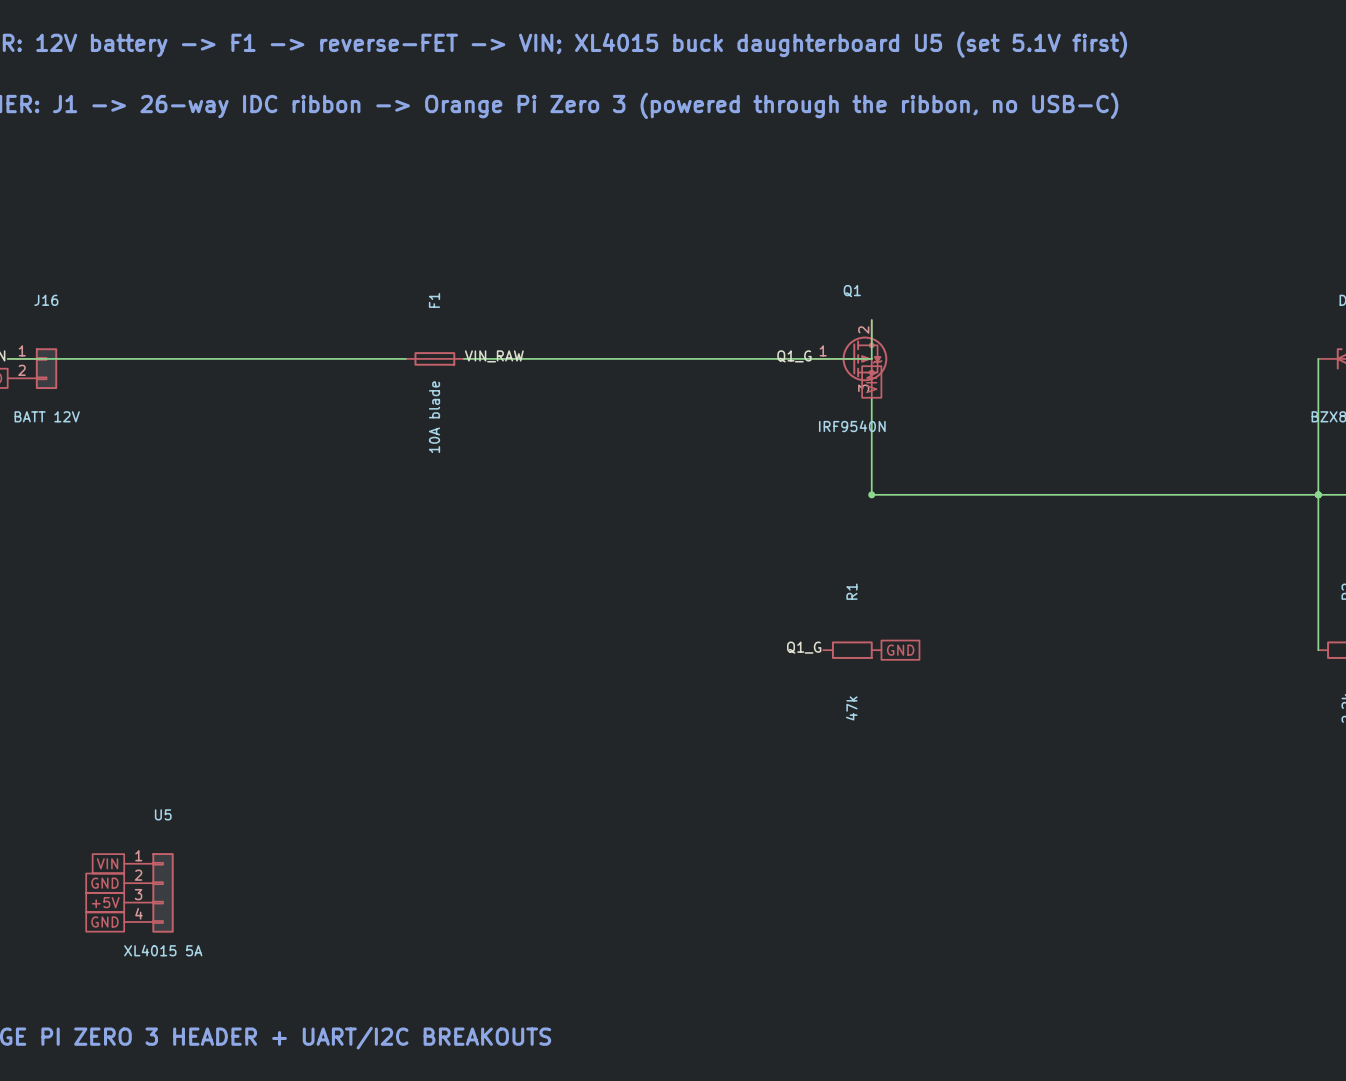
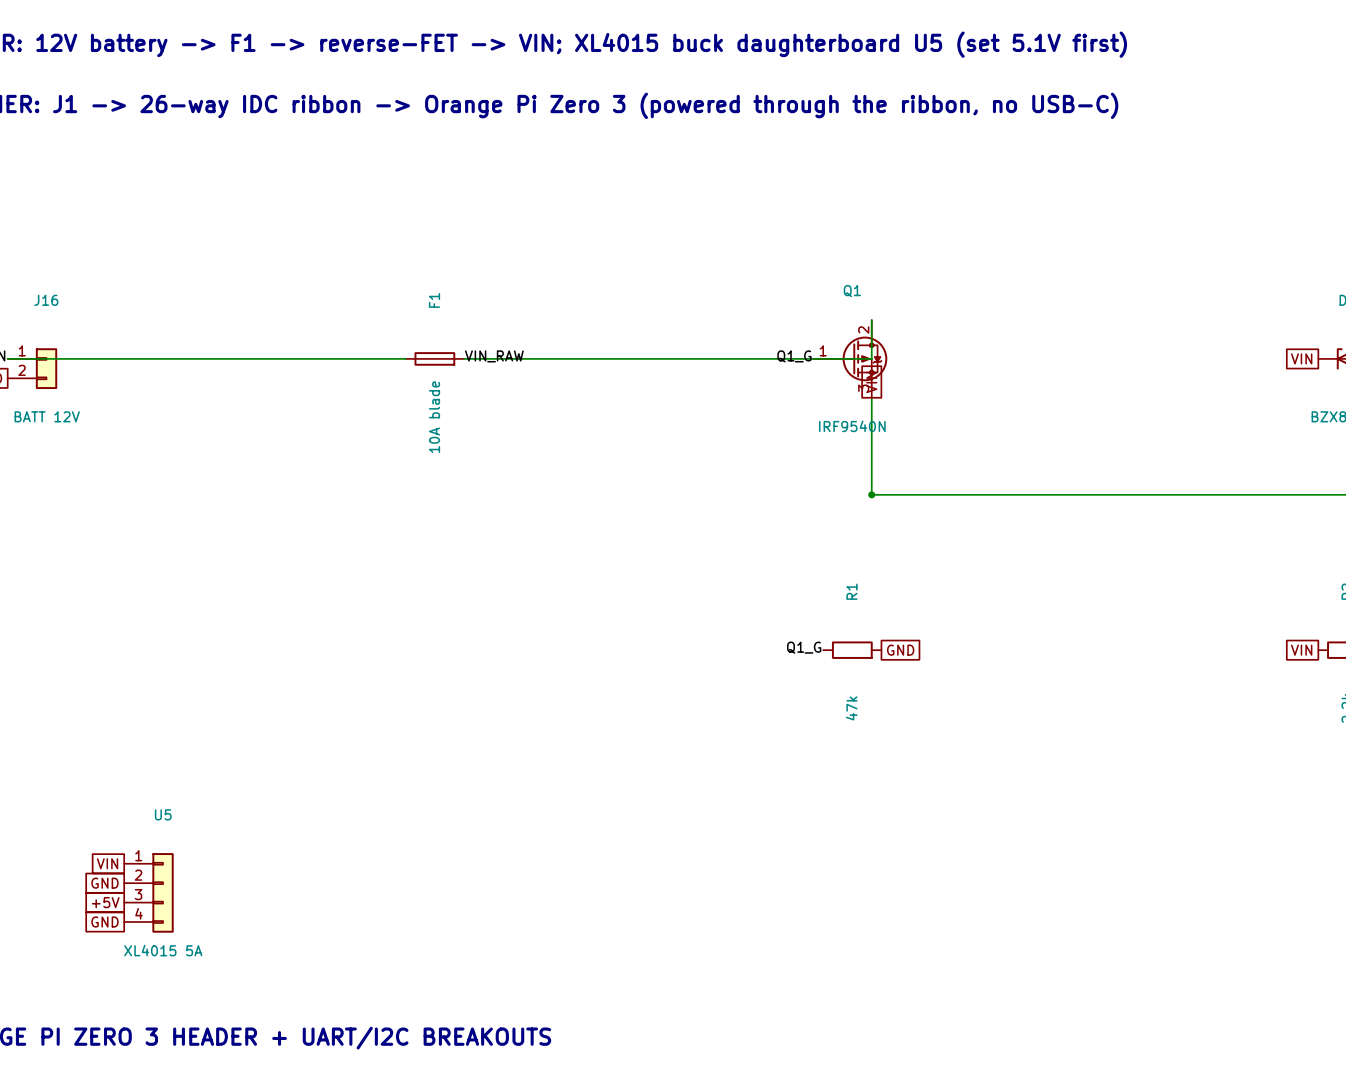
global label: none -> VIN (1301, 358)
wire: (1318, 358) (1318, 650) -> none
junction: (1318, 494) -> none
global label: none -> VIN (1301, 650)

